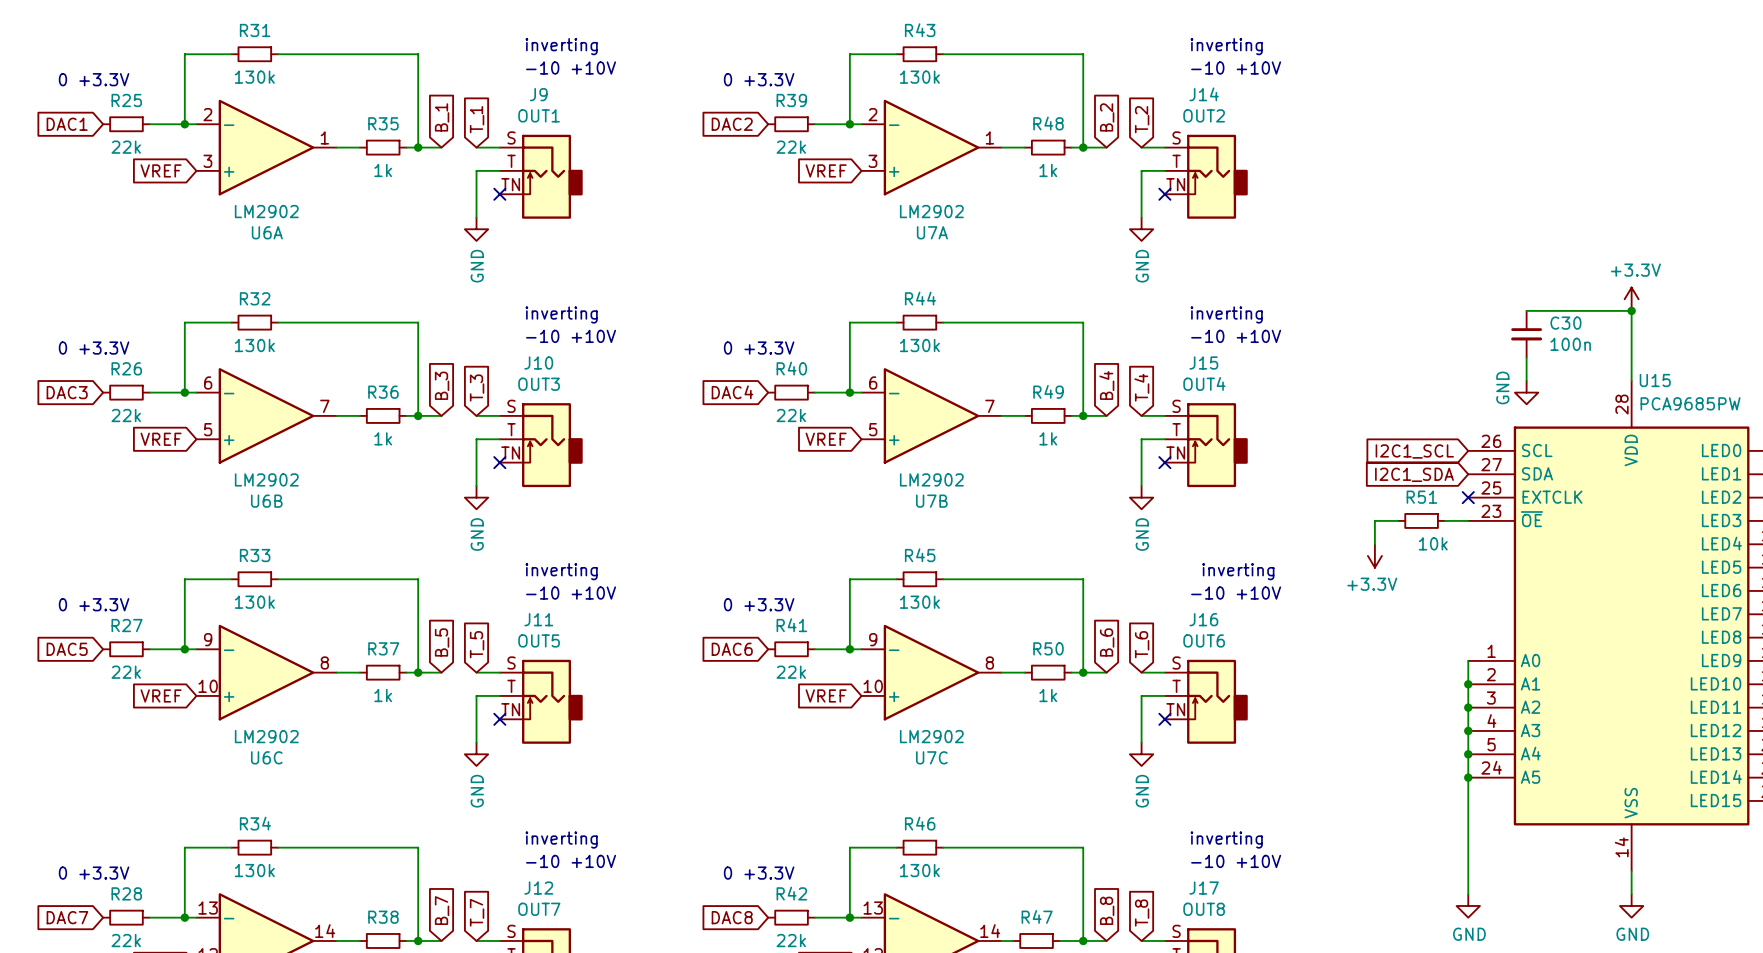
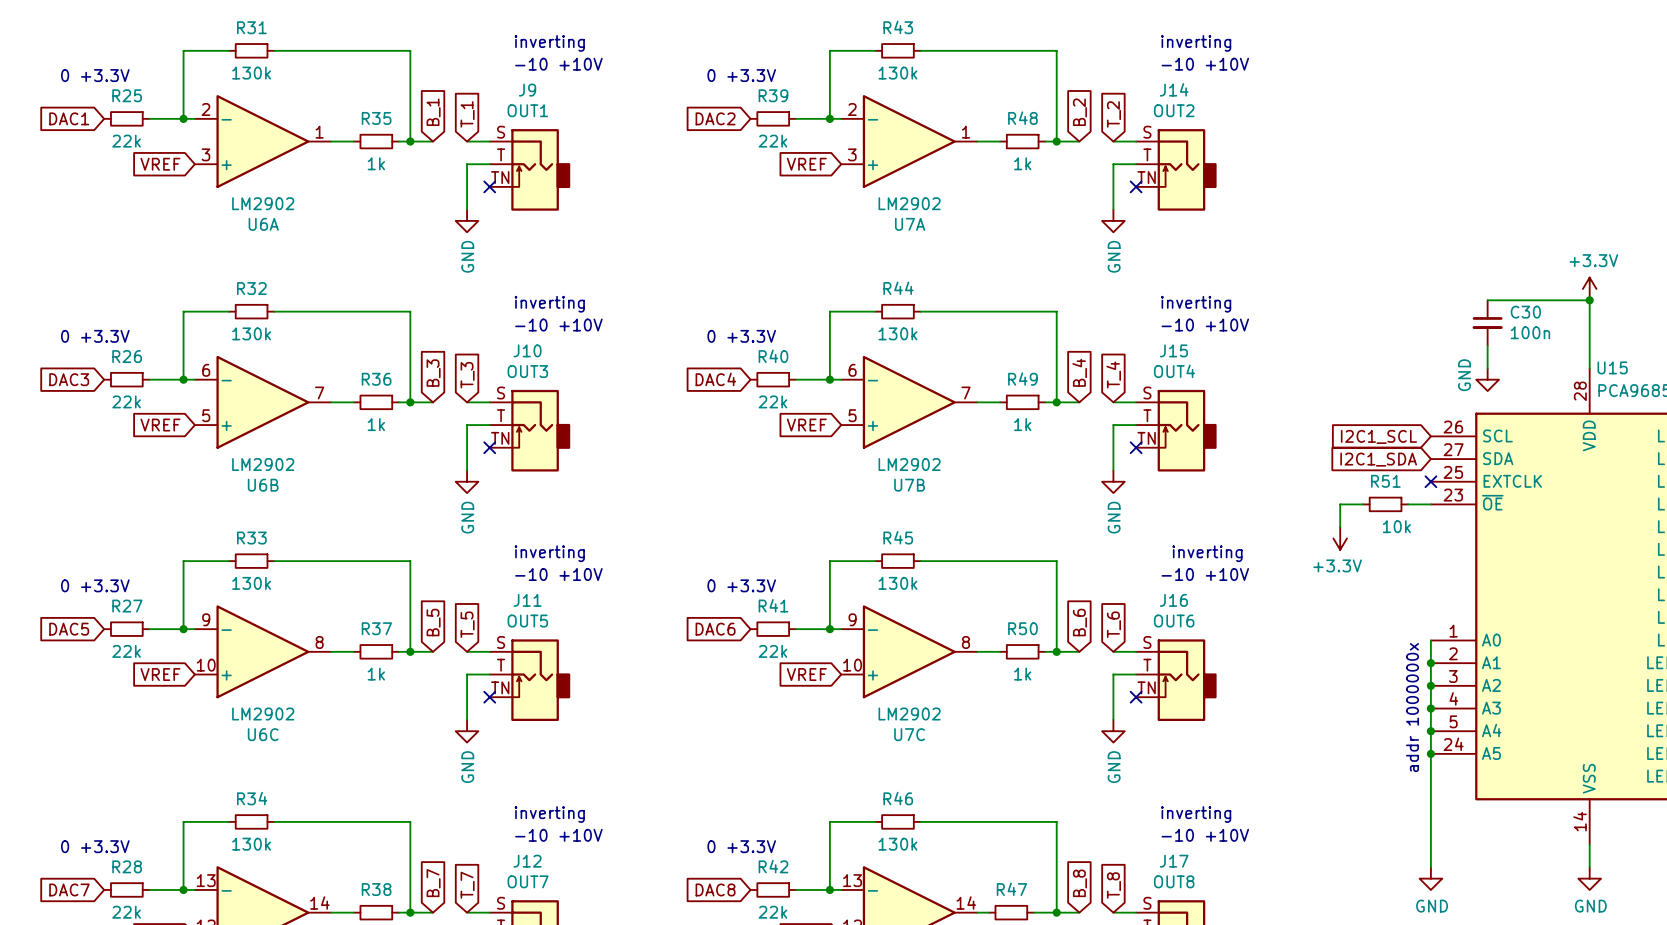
text: none -> addr 1000000x (1412, 707)

